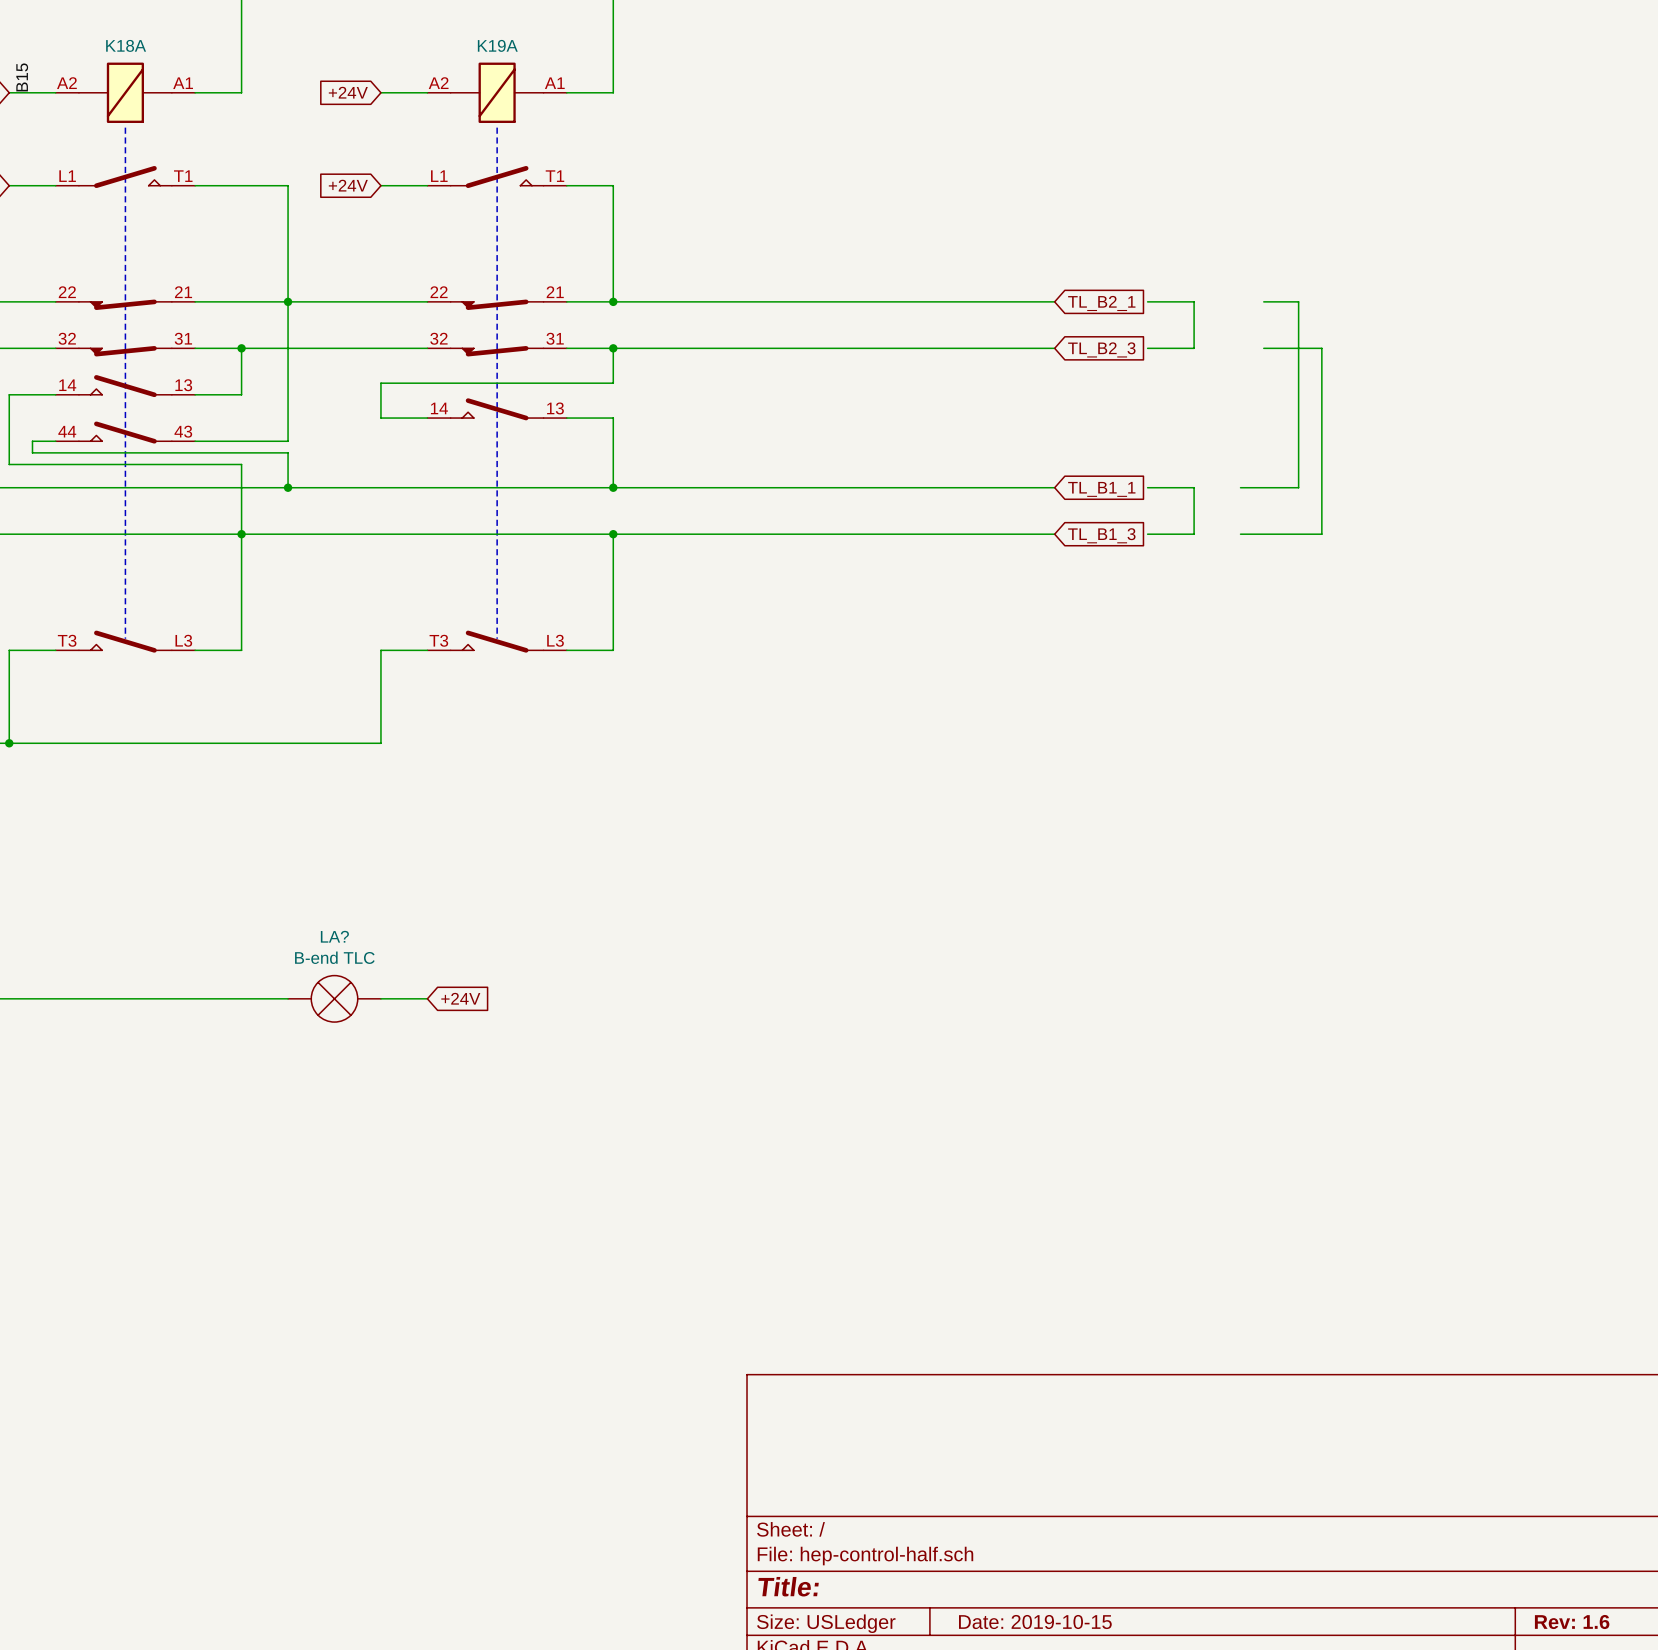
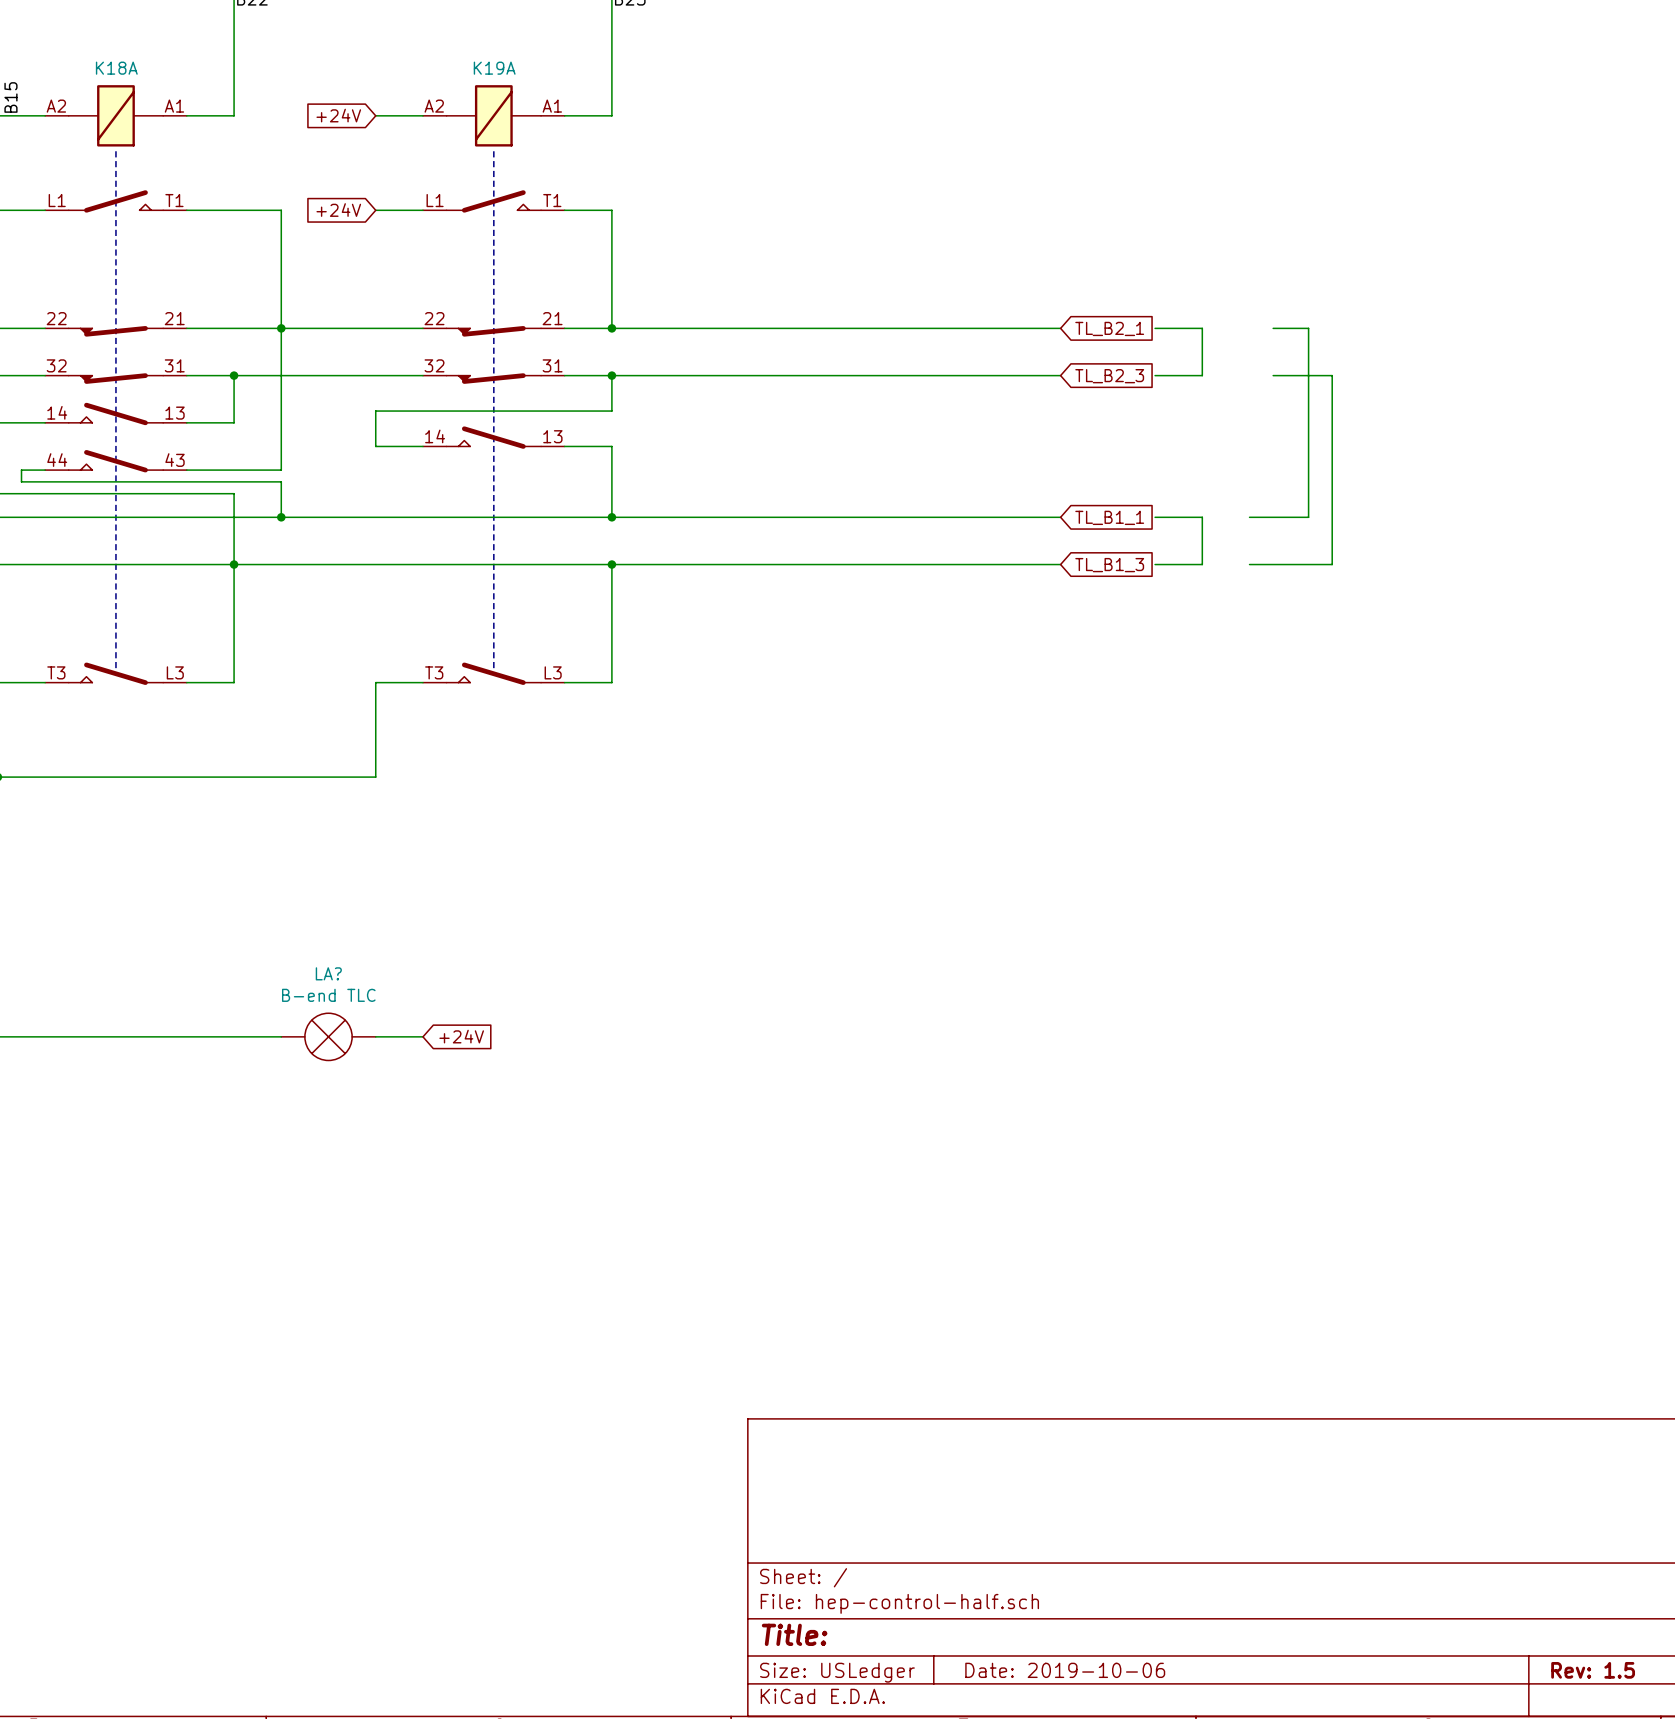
title block: Date: 2019-10-15 (1035, 1622) -> Date: 2019-10-06 (1065, 1670)
title block: Rev: 1.6 (1572, 1622) -> Rev: 1.5 (1593, 1670)

